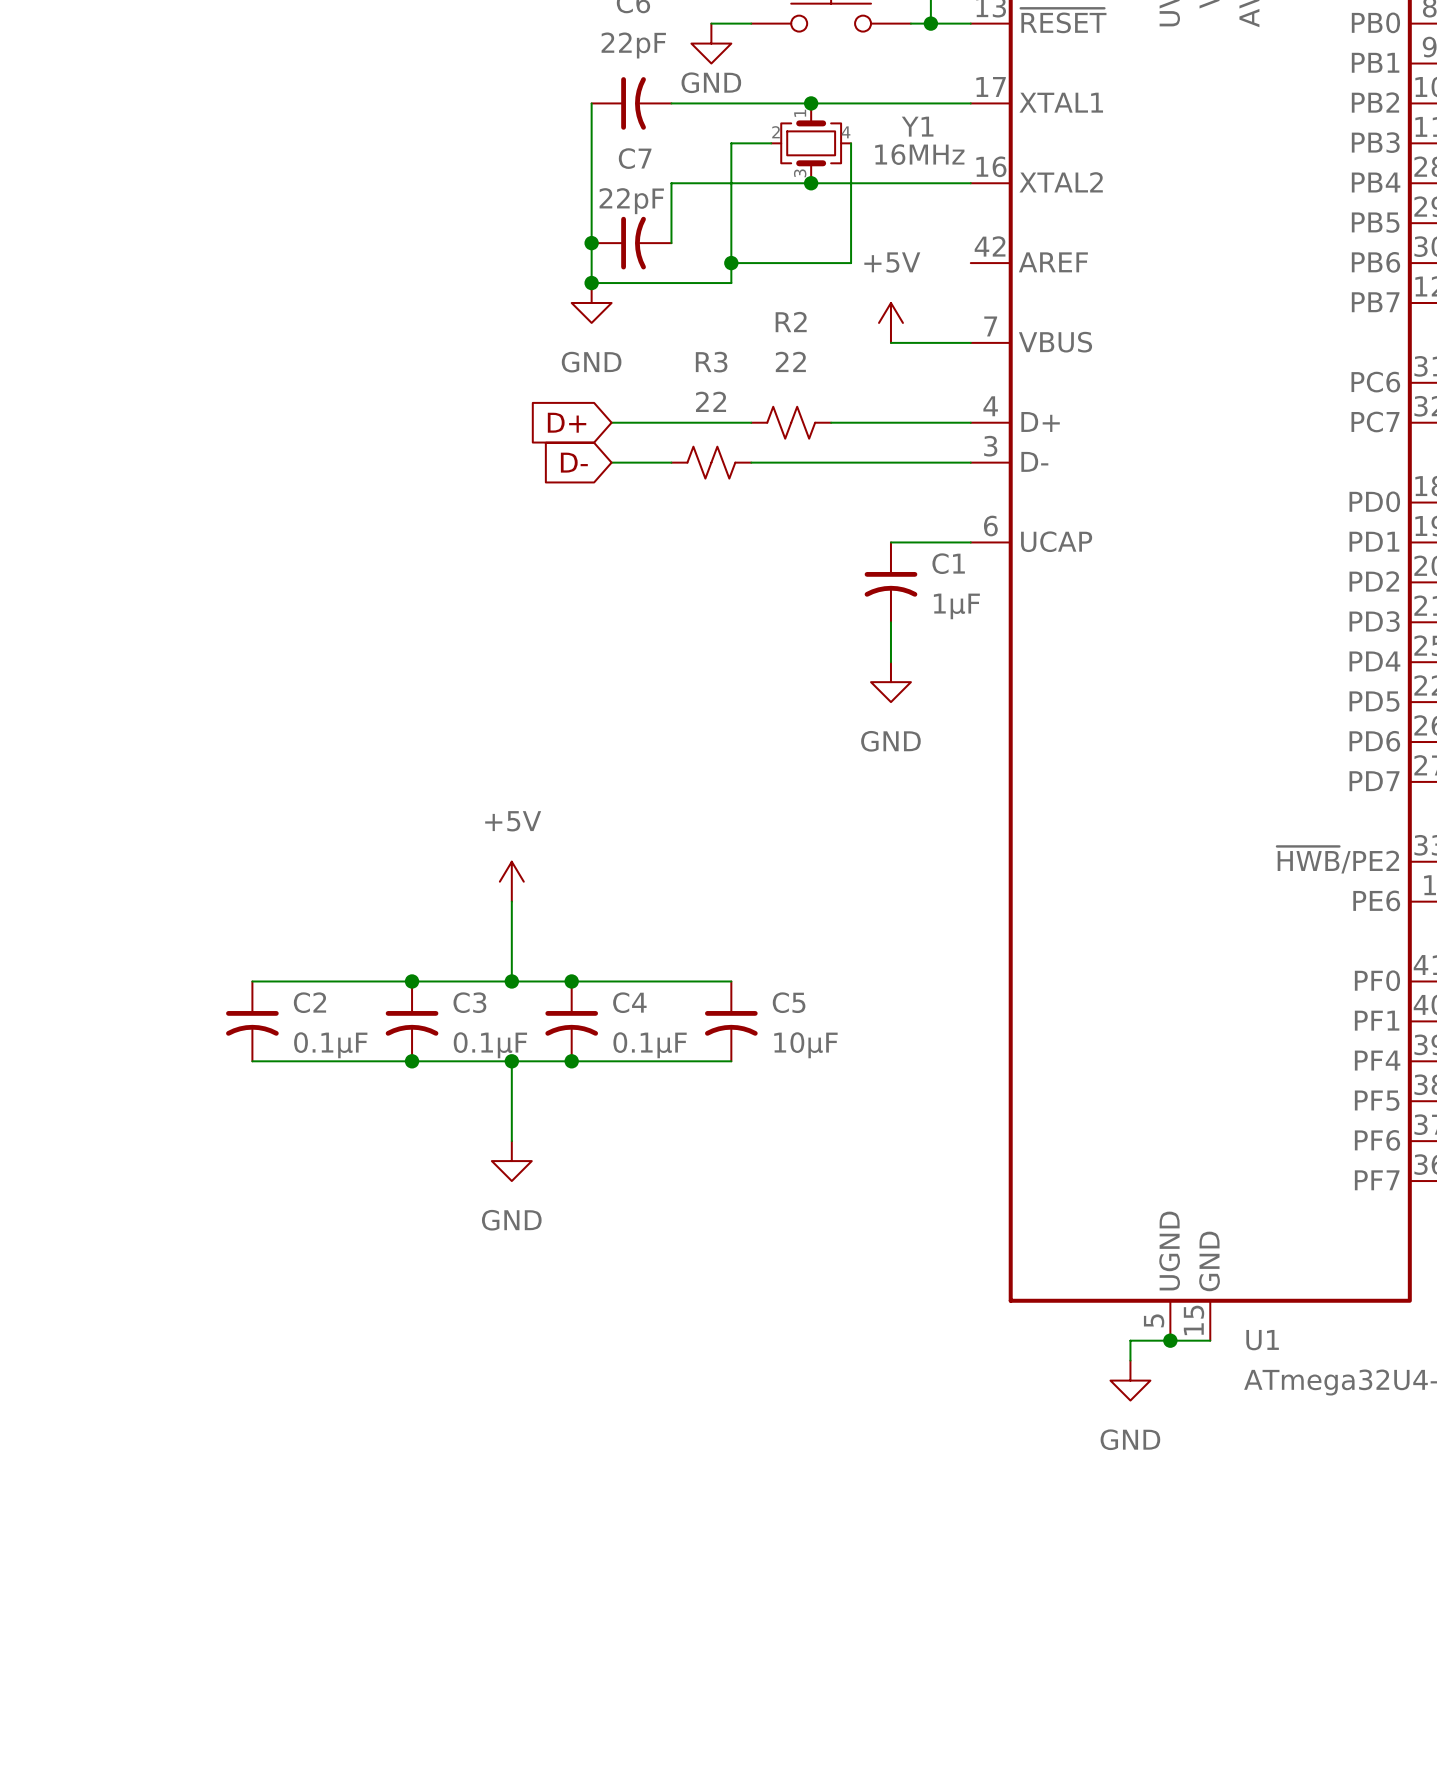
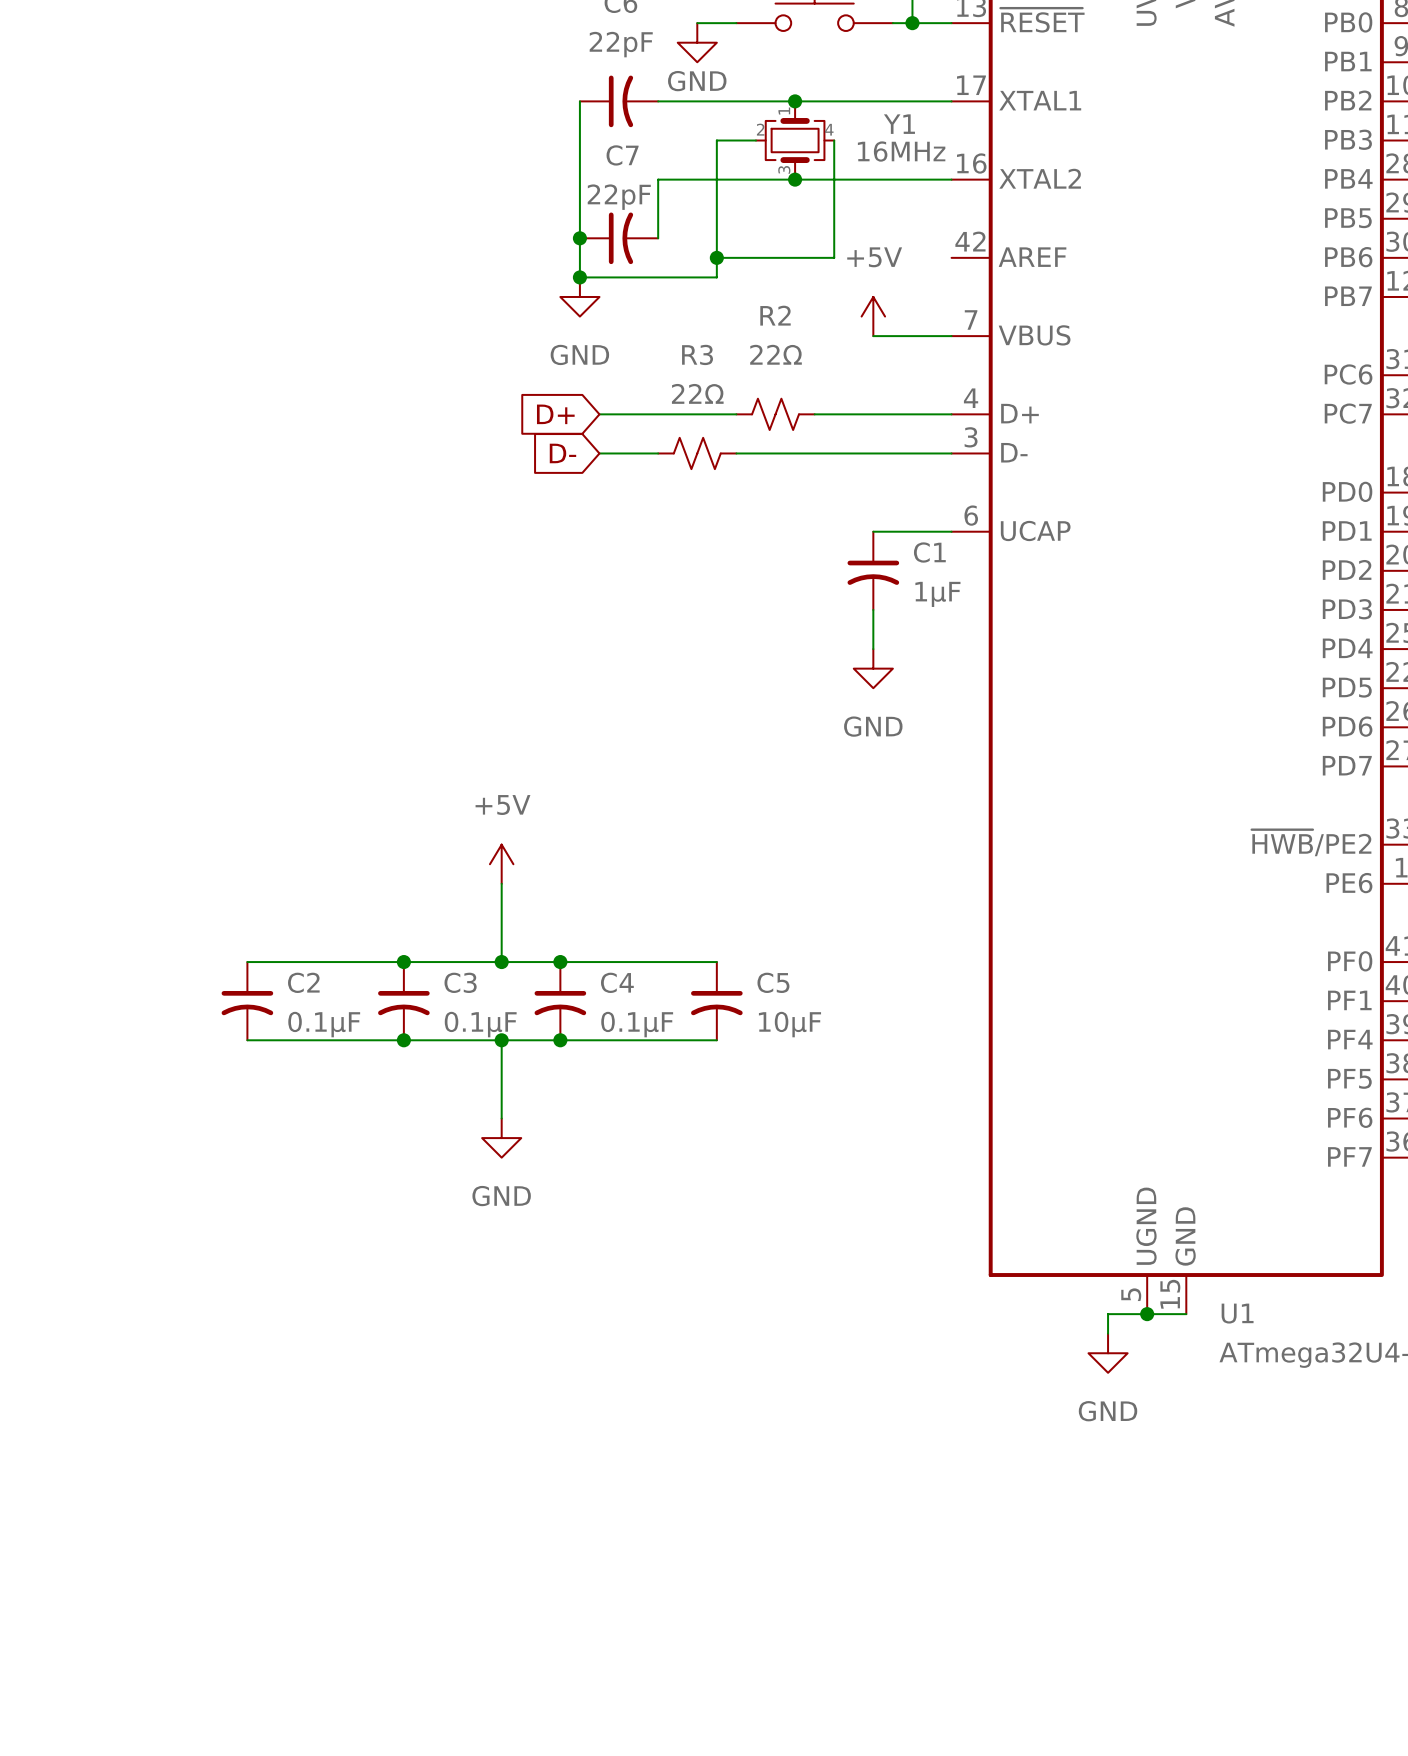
R2 value: 22 (790, 361) -> 22Ω (776, 354)
R3 value: 22 (711, 401) -> 22Ω (697, 393)

